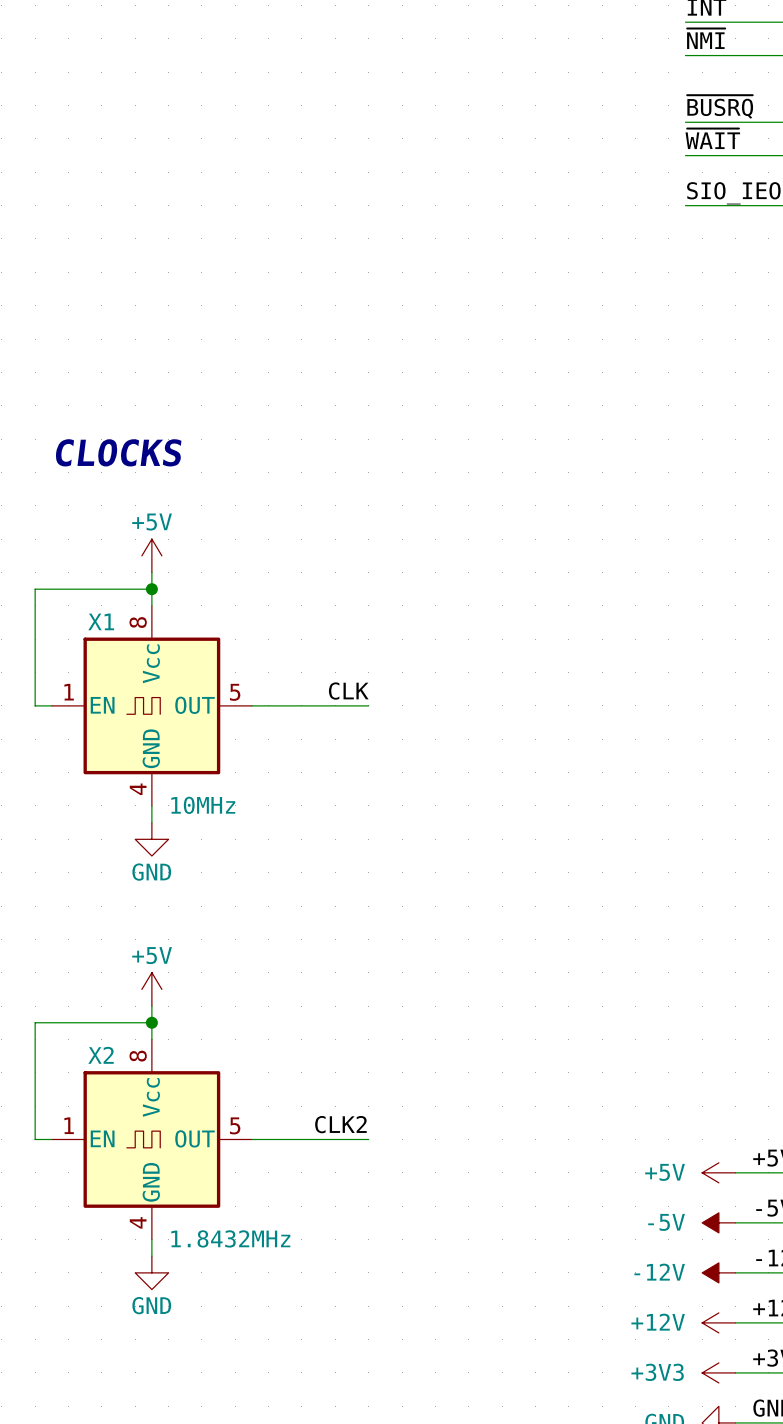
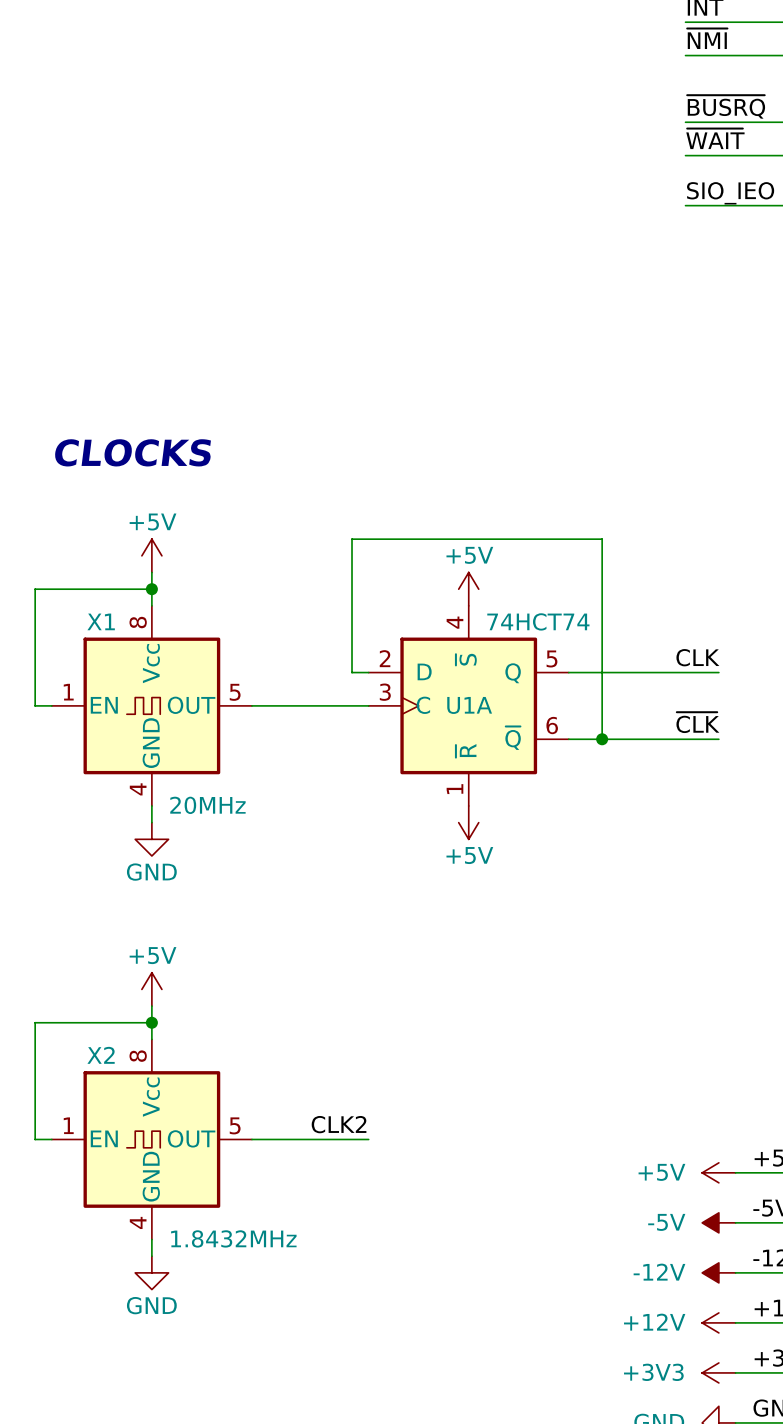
power symbol: none -> +5V (468, 589)
label: none -> CLK (697, 657)
wire: none -> (368, 672) (352, 672) (352, 539) (602, 539) (602, 739)
wire: none -> (568, 672) (718, 672)
label: CLK (348, 691) -> none
U1A: none -> 74HCT74 (468, 705)
label: none -> ~{CLK} (697, 722)
wire: none -> (568, 739) (718, 739)
junction: none -> (602, 739)
X1 value: 10MHz (203, 805) -> 20MHz (207, 805)
power symbol: none -> +5V (468, 822)

